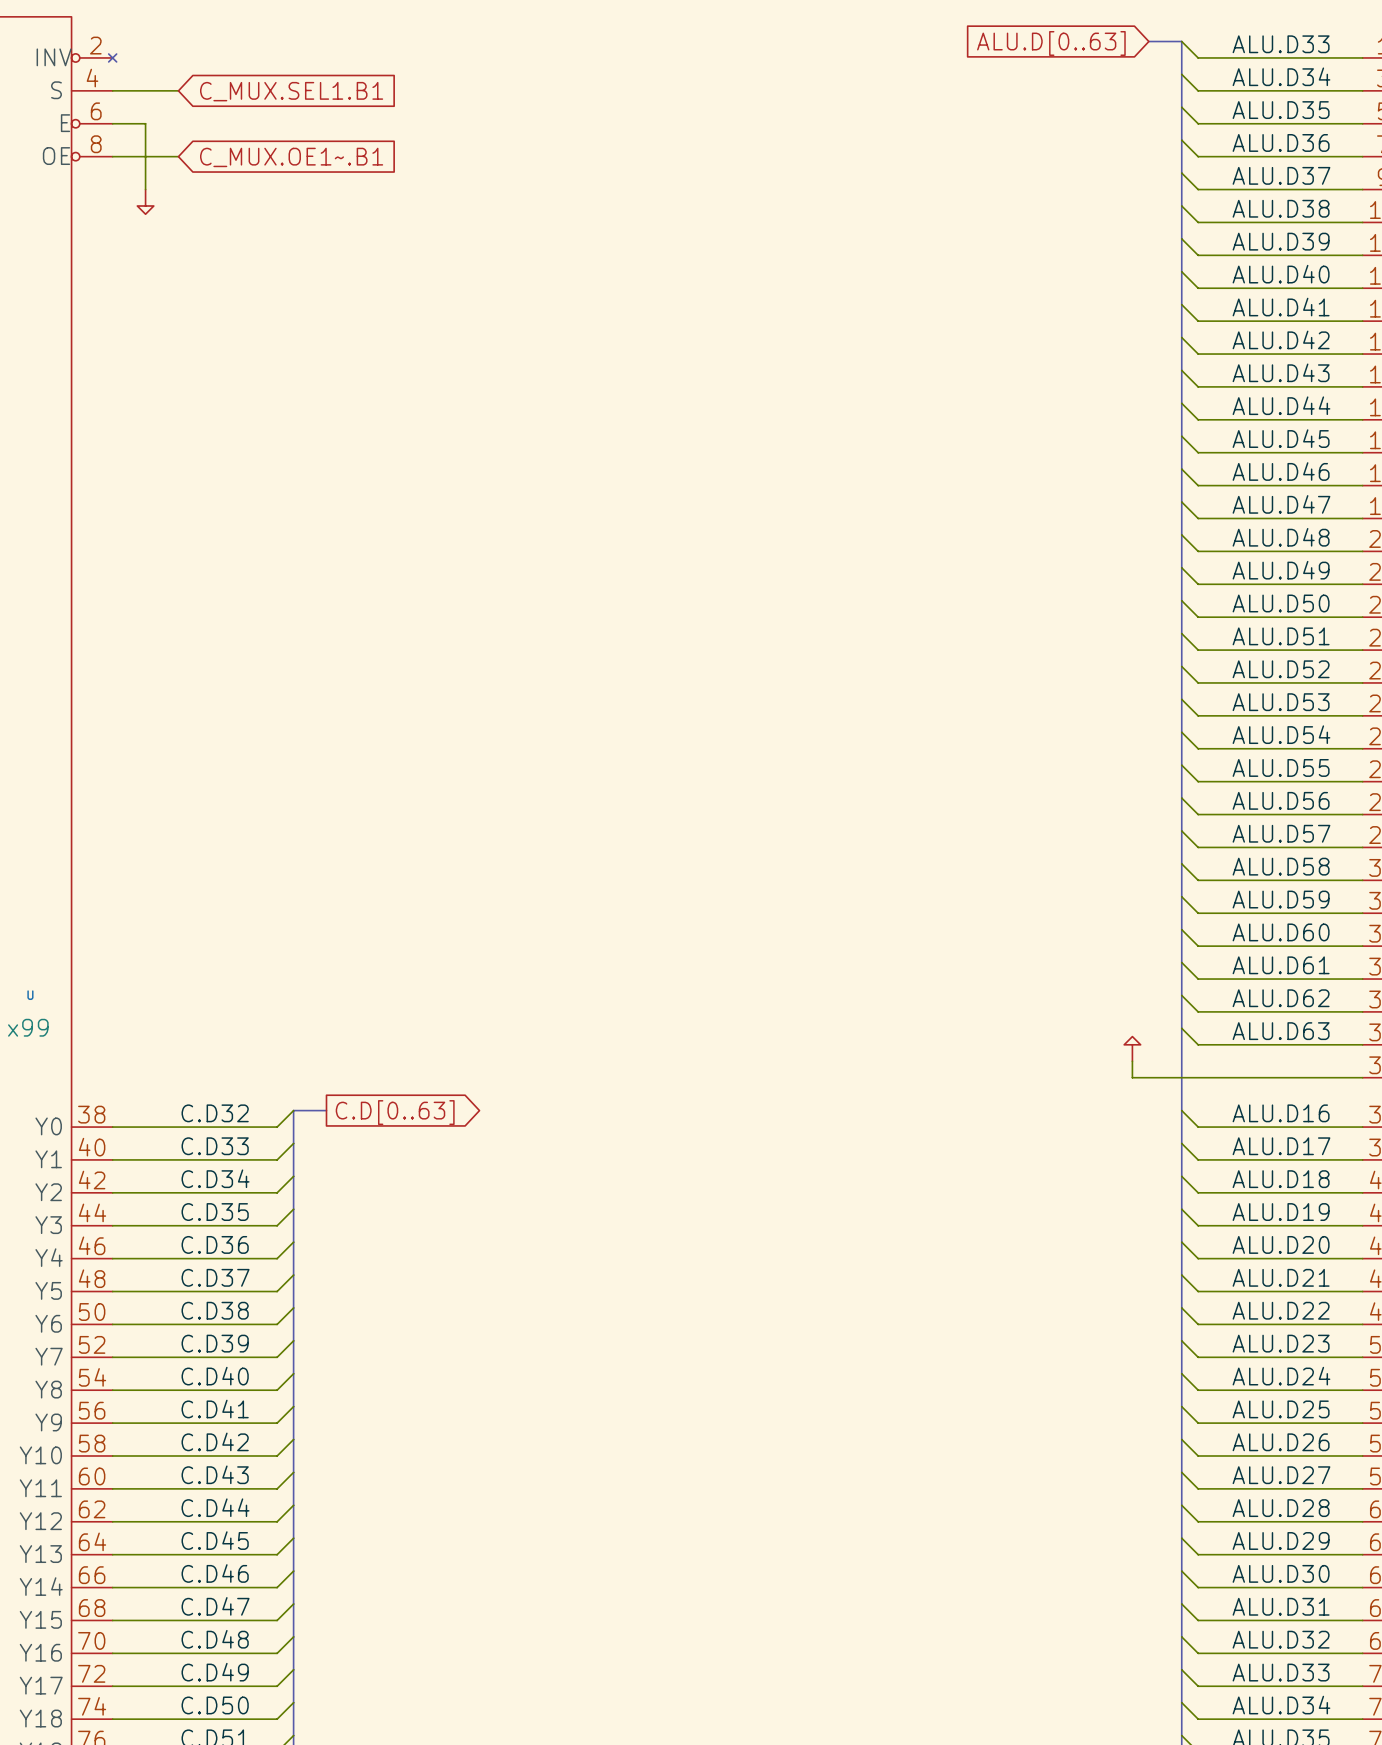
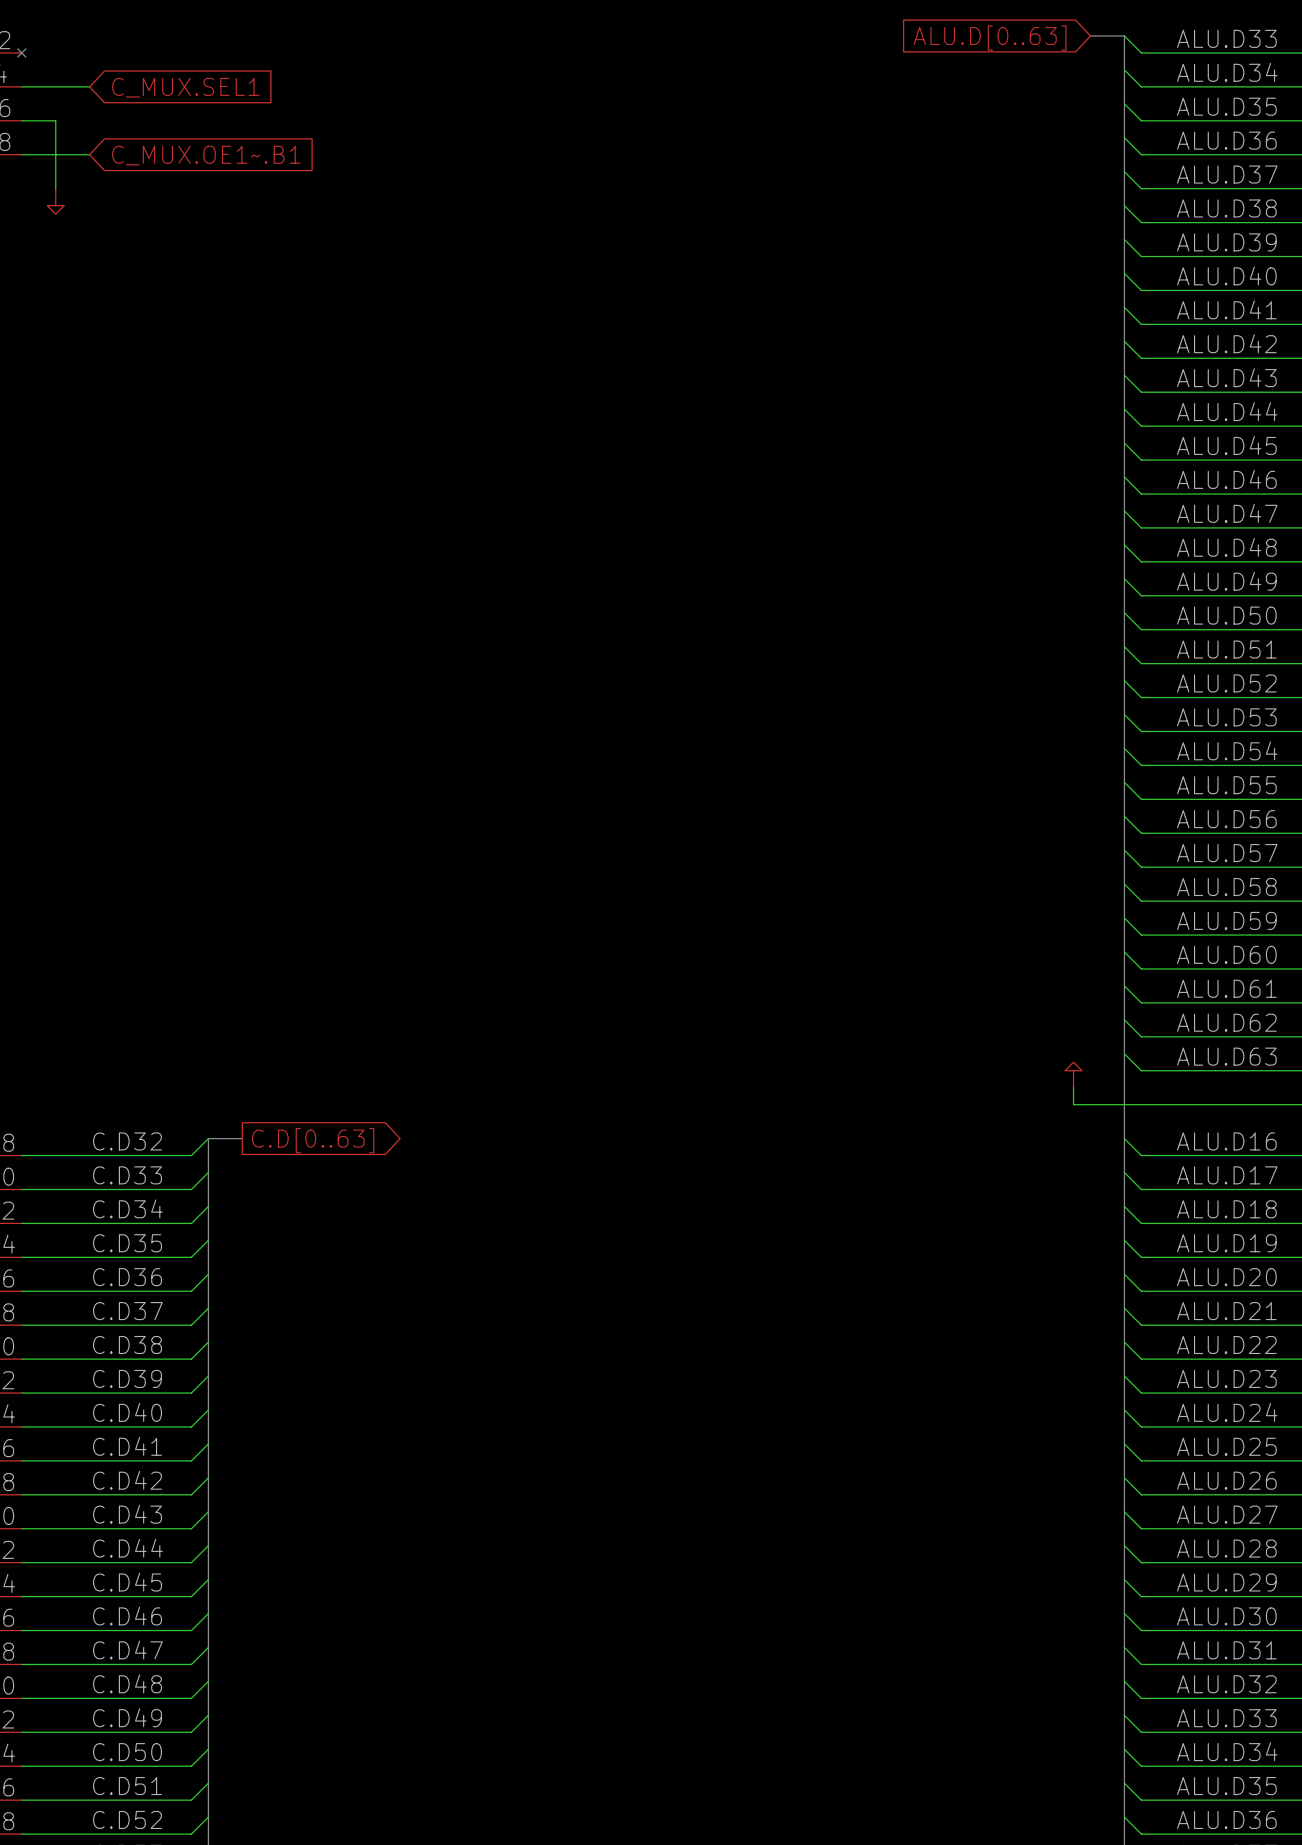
global label: C_MUX.SEL1.B1 (291, 91) -> C_MUX.SEL1 (185, 87)

